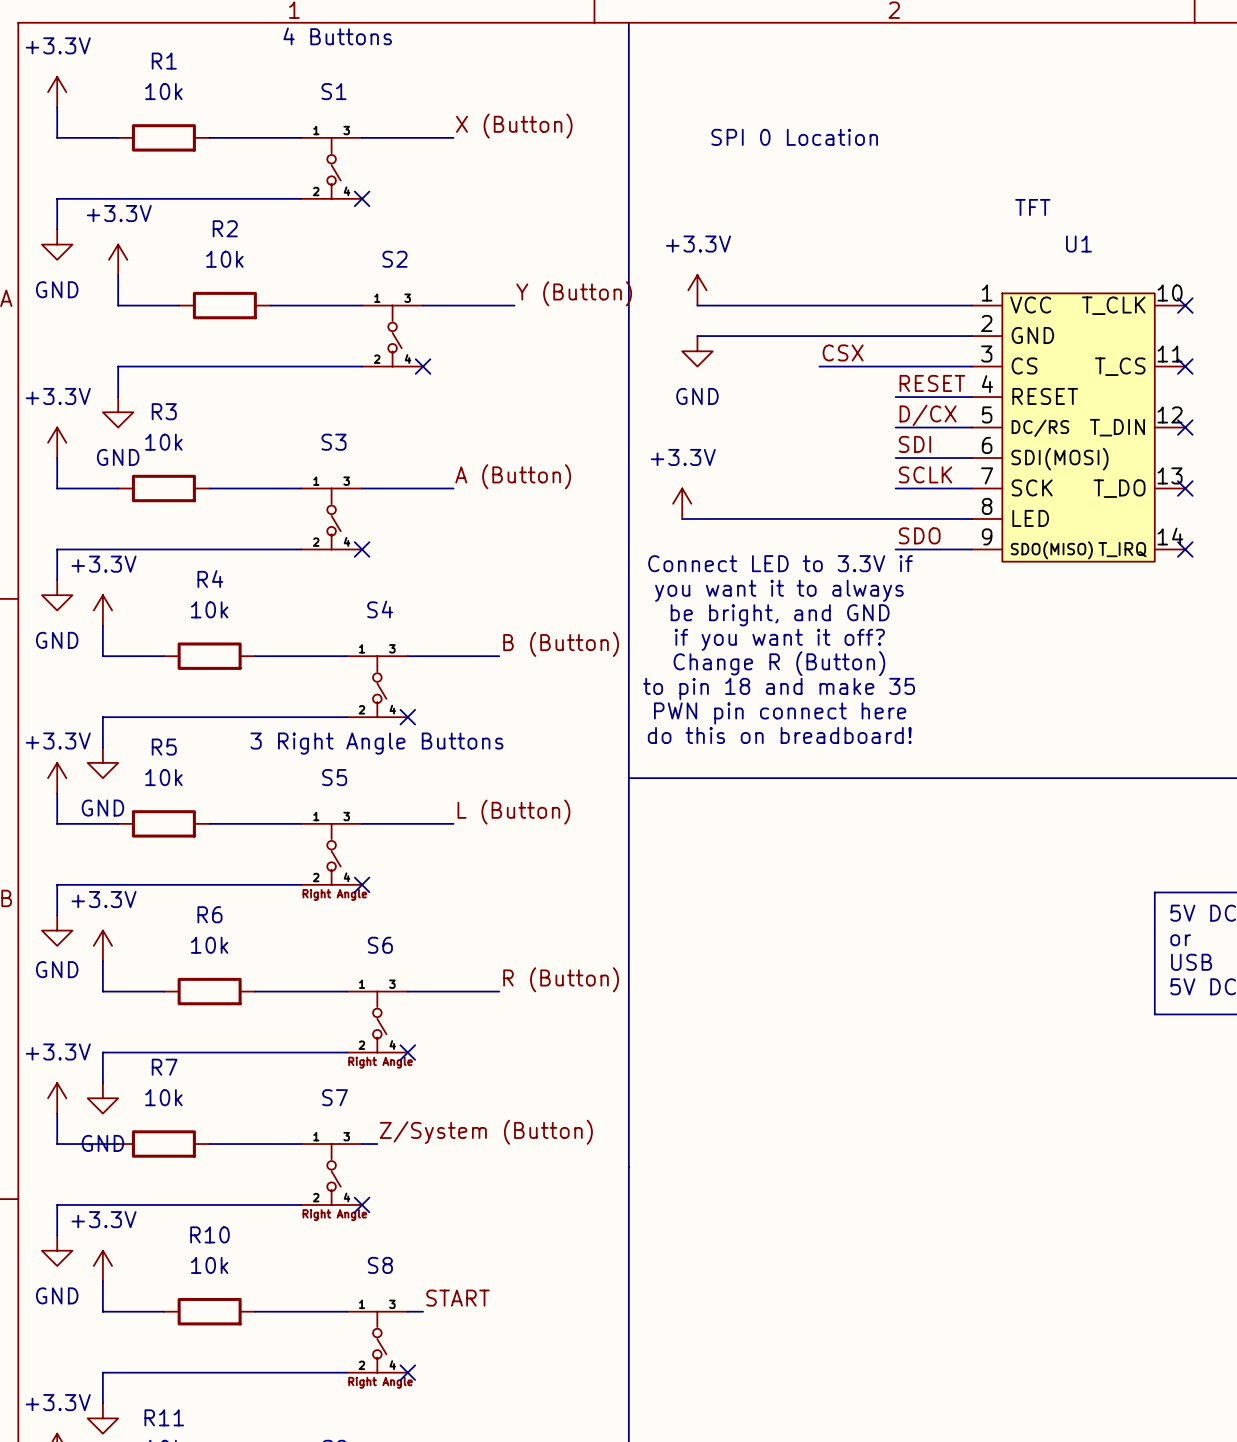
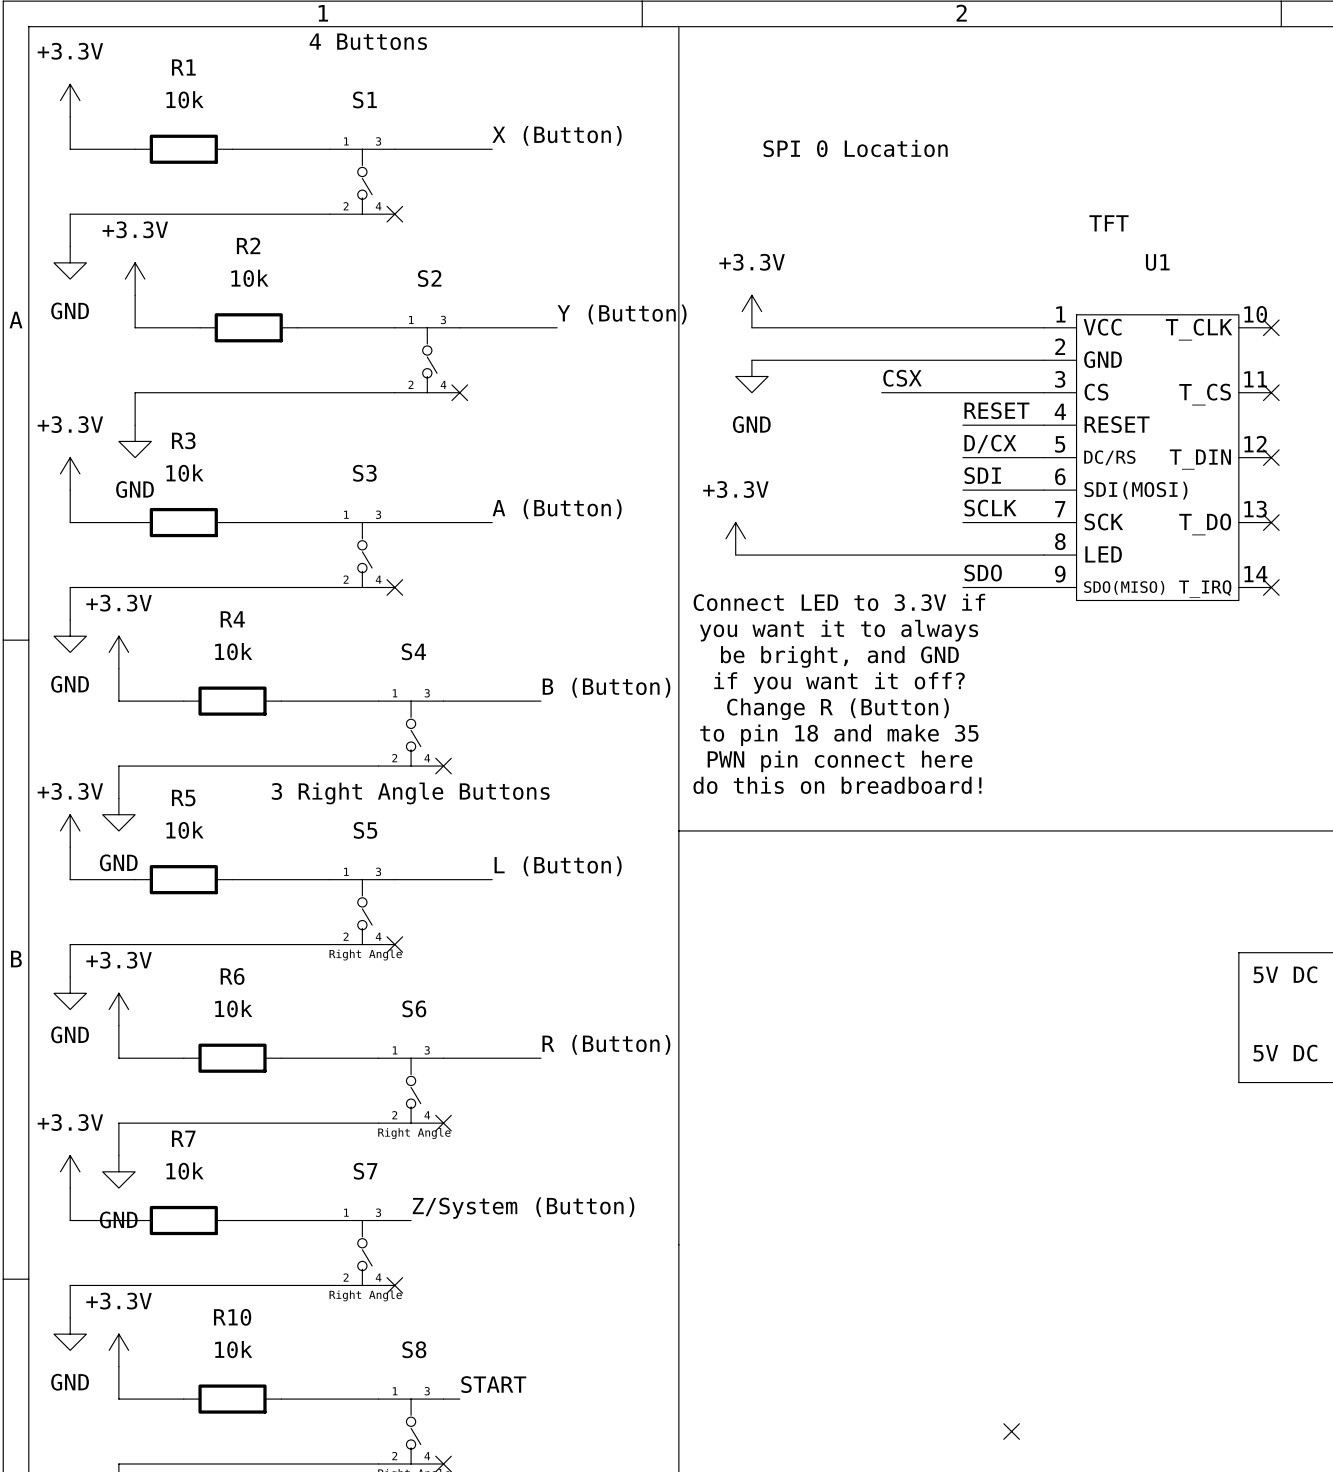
text: or (1180, 940) -> none
text: USB (1191, 962) -> none
no-connect mark: none -> (1011, 1431)

